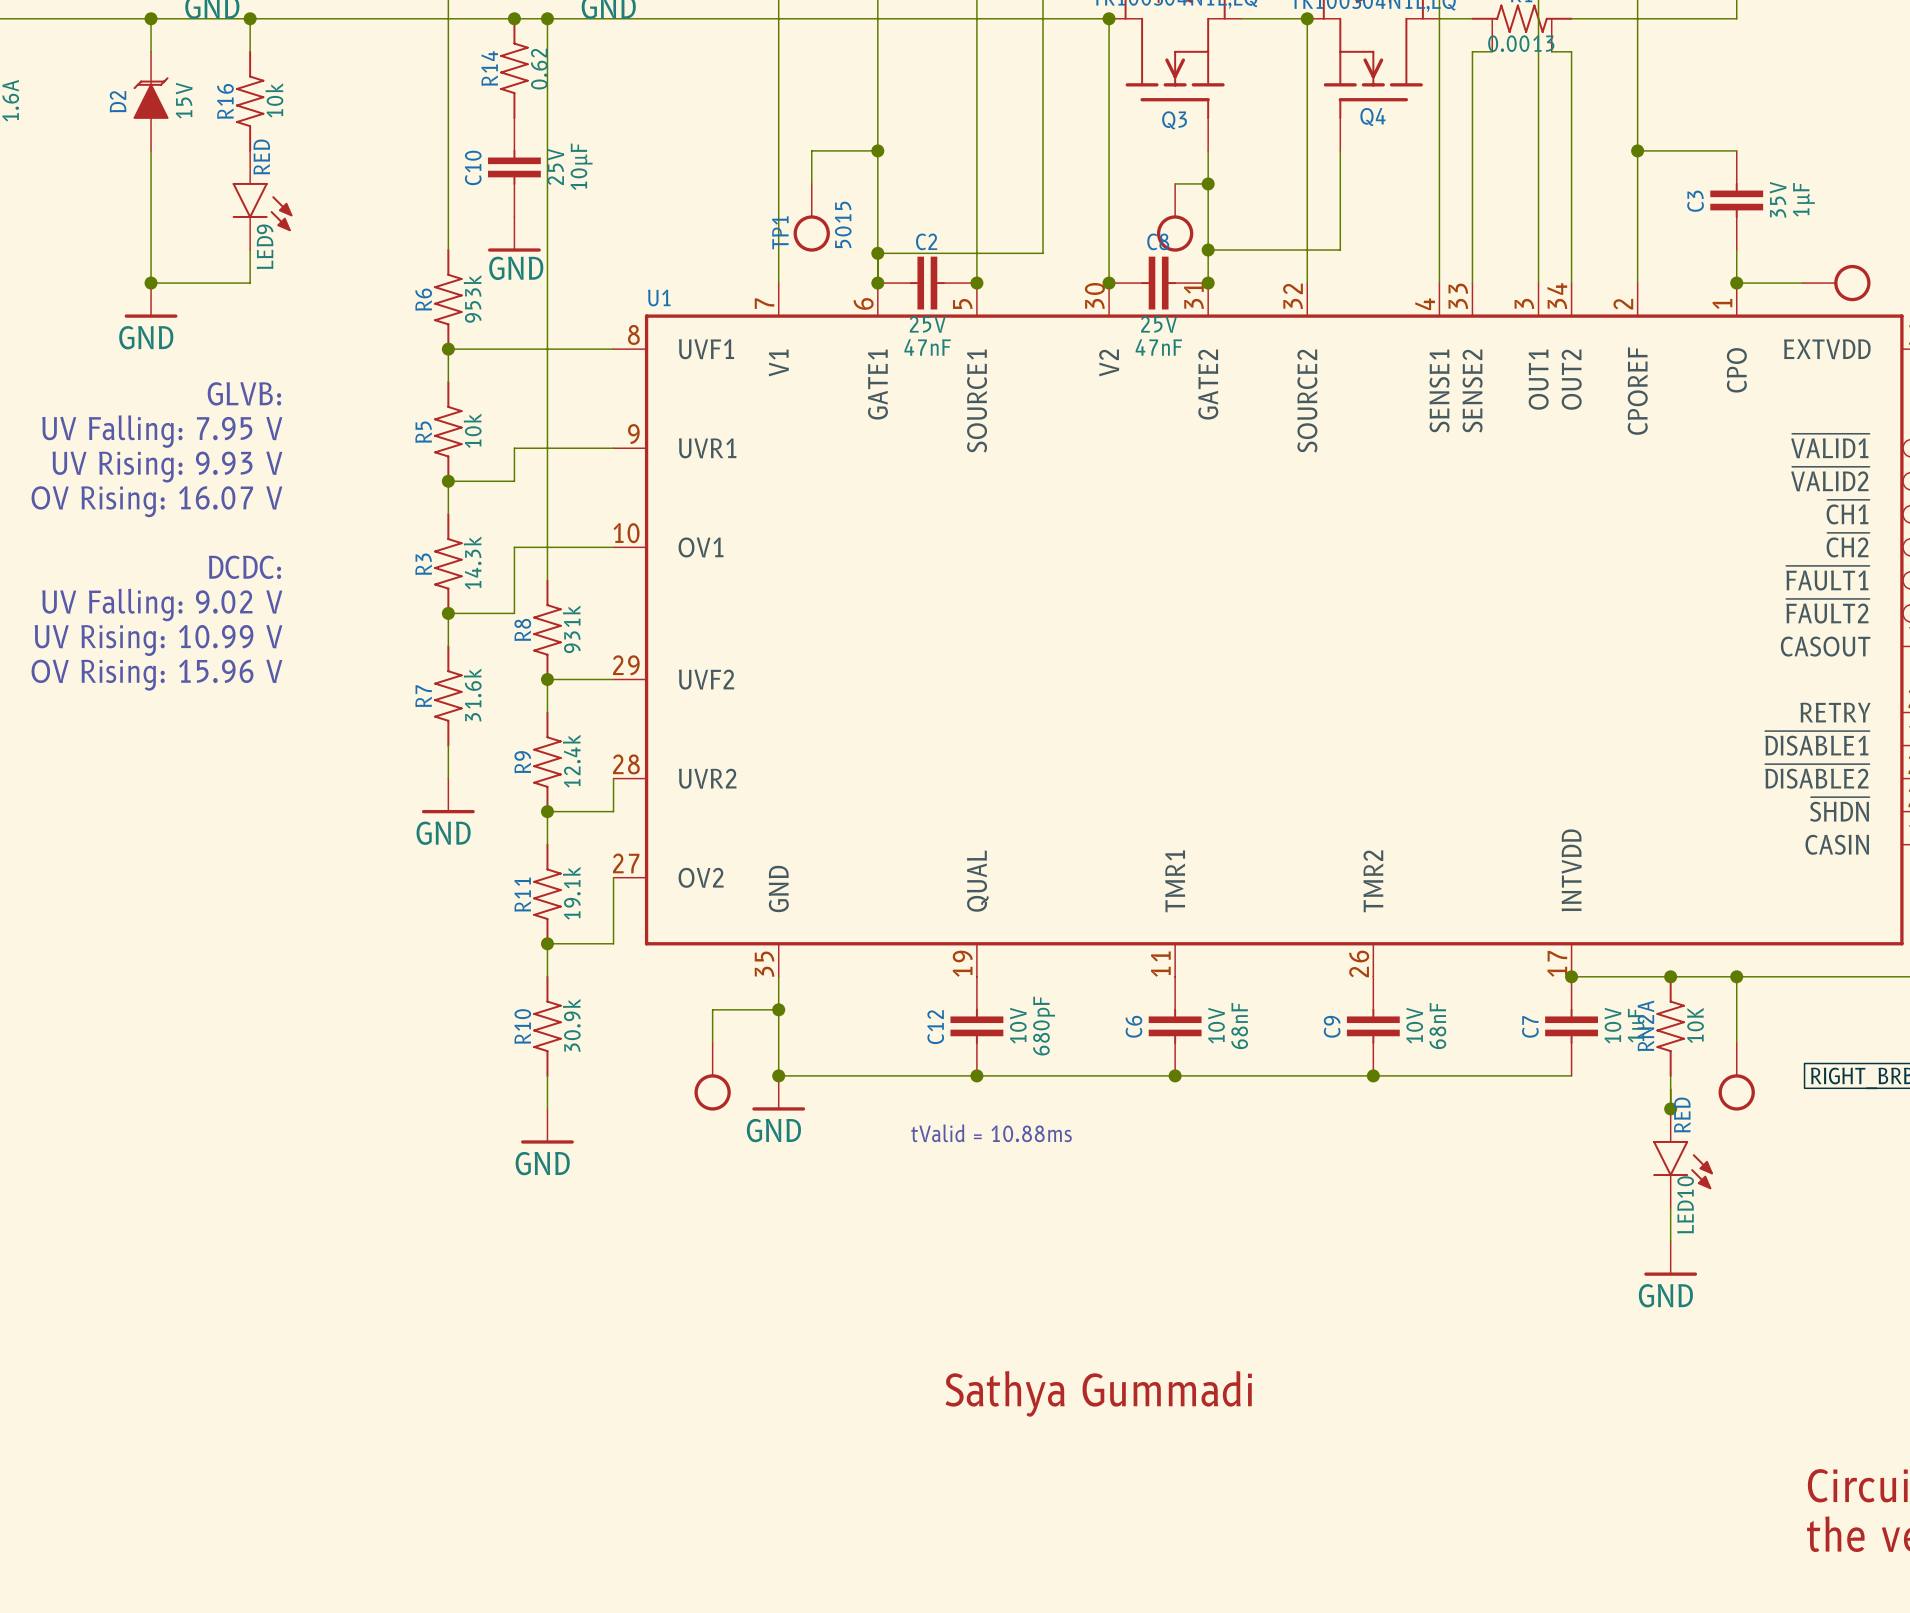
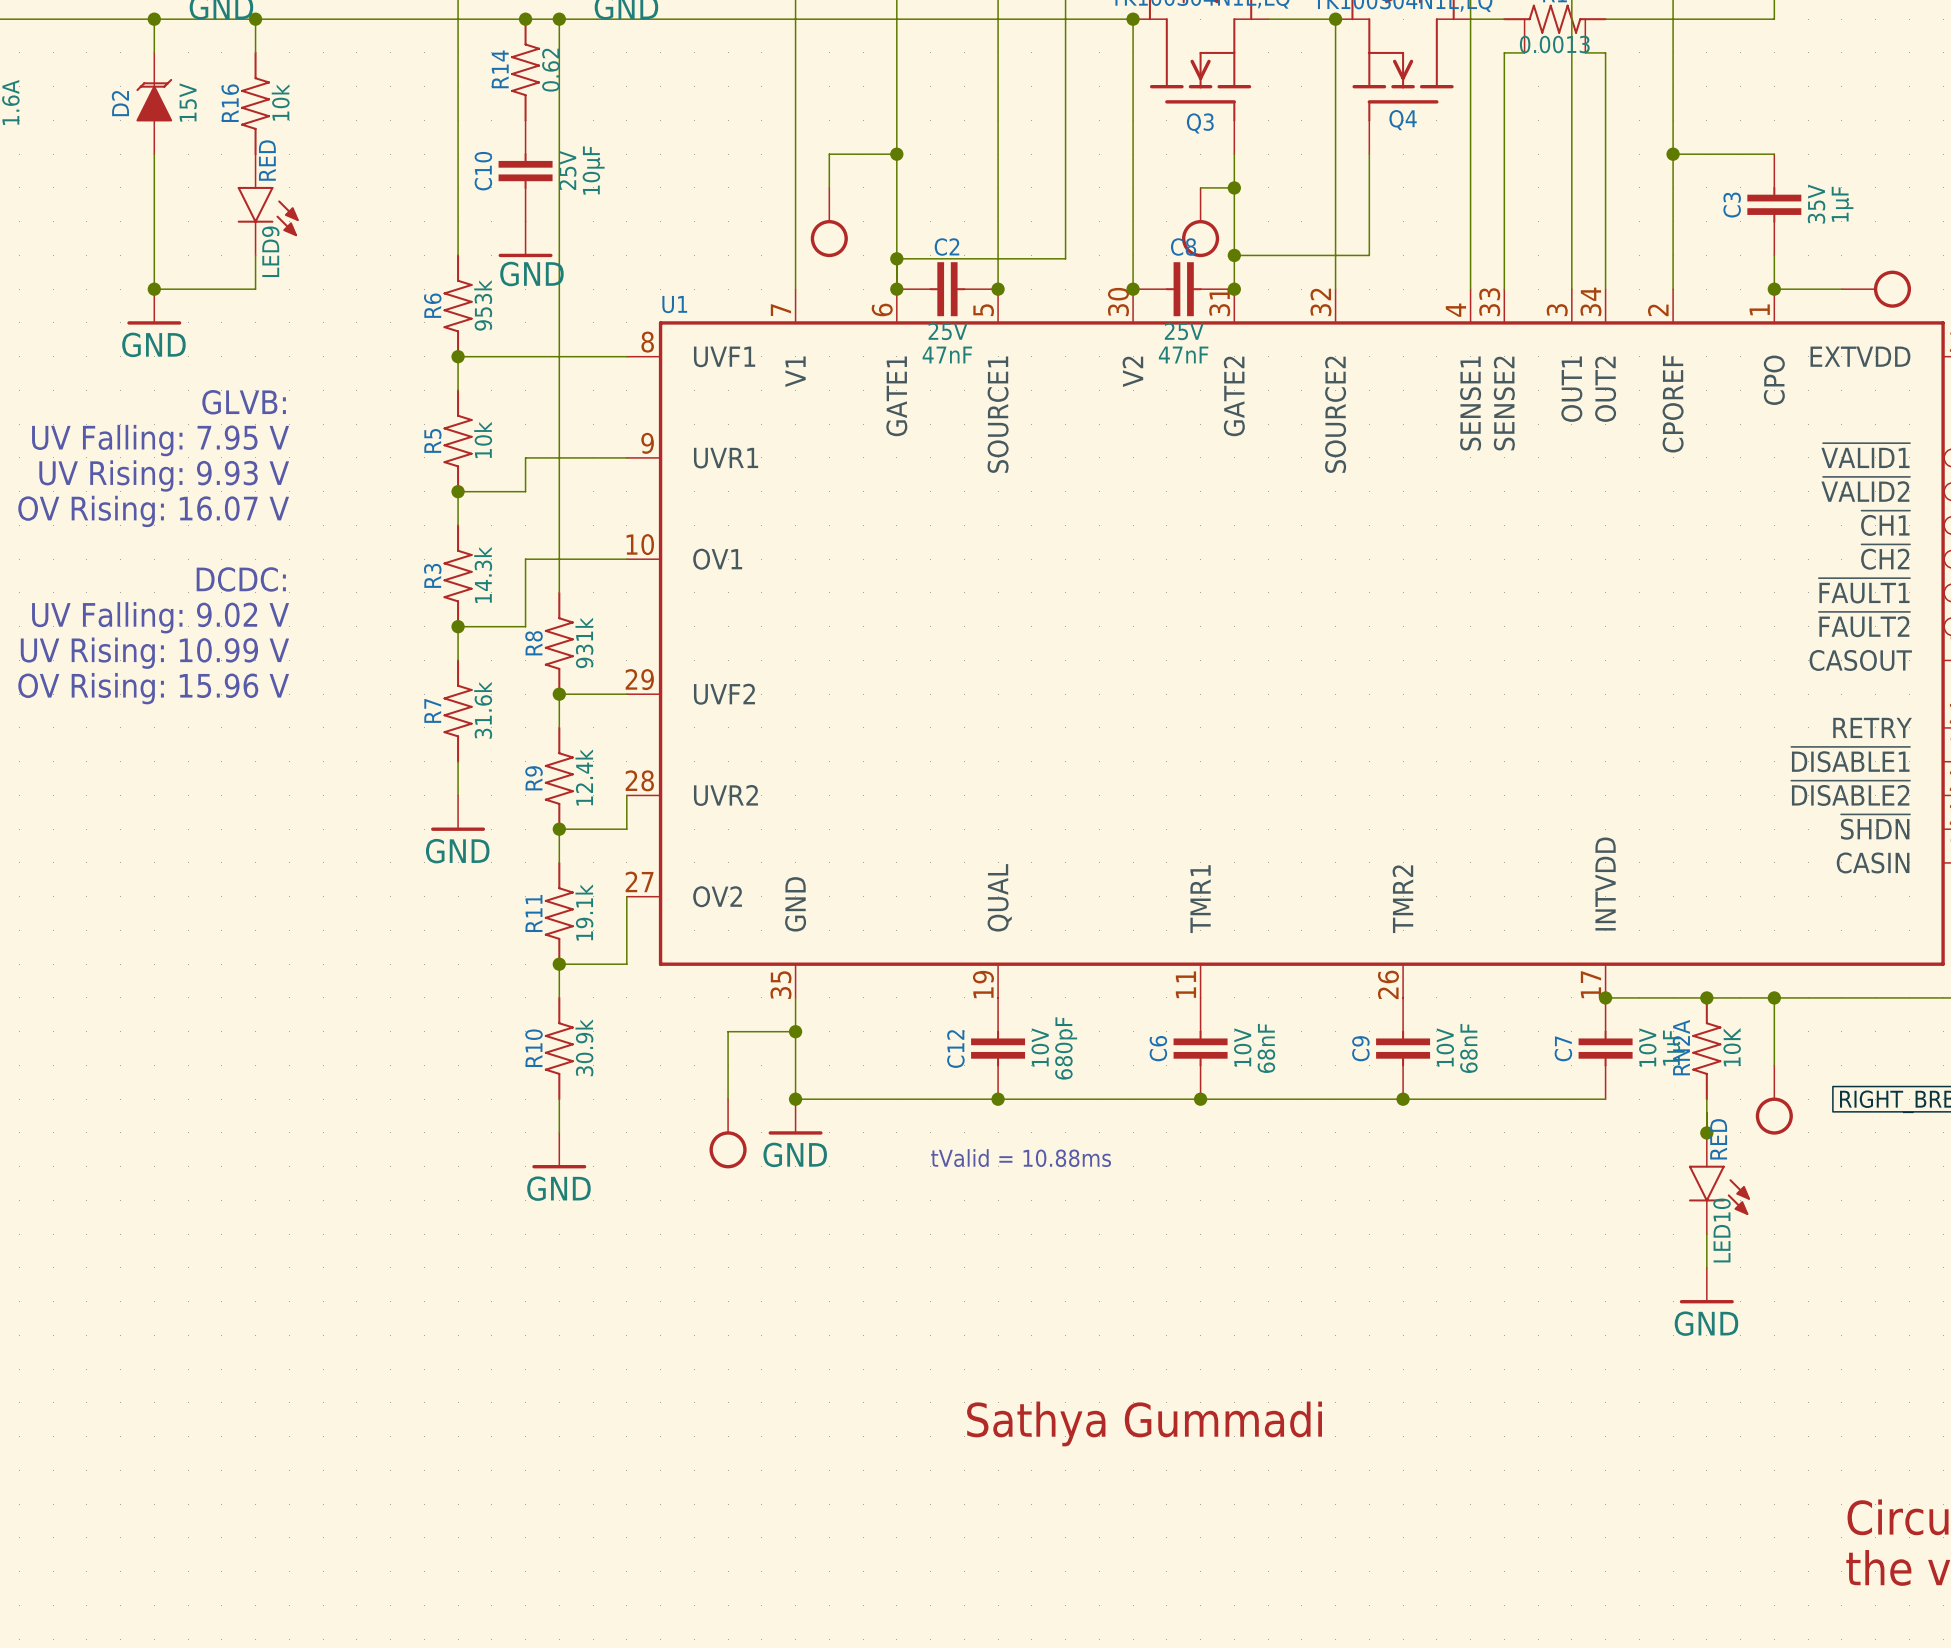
TP1 text: 5015 (843, 224) -> none
TP1 name: TP1 (780, 232) -> none
part position: (712, 1076) -> (728, 1133)

